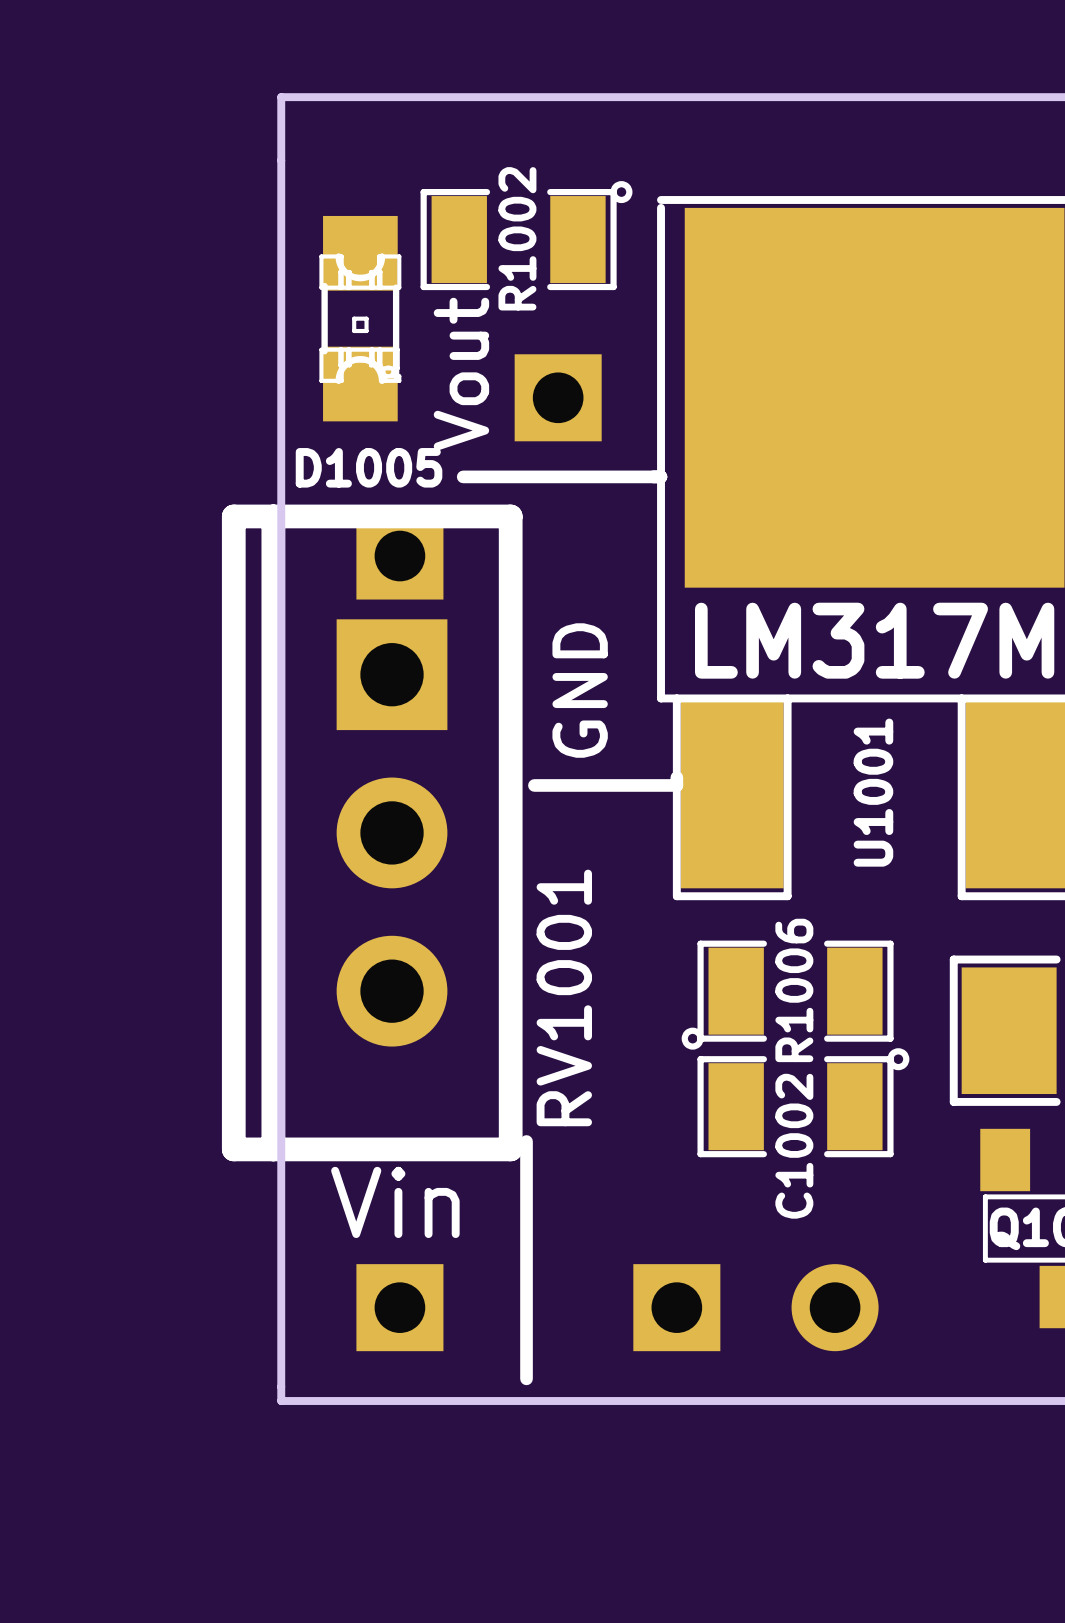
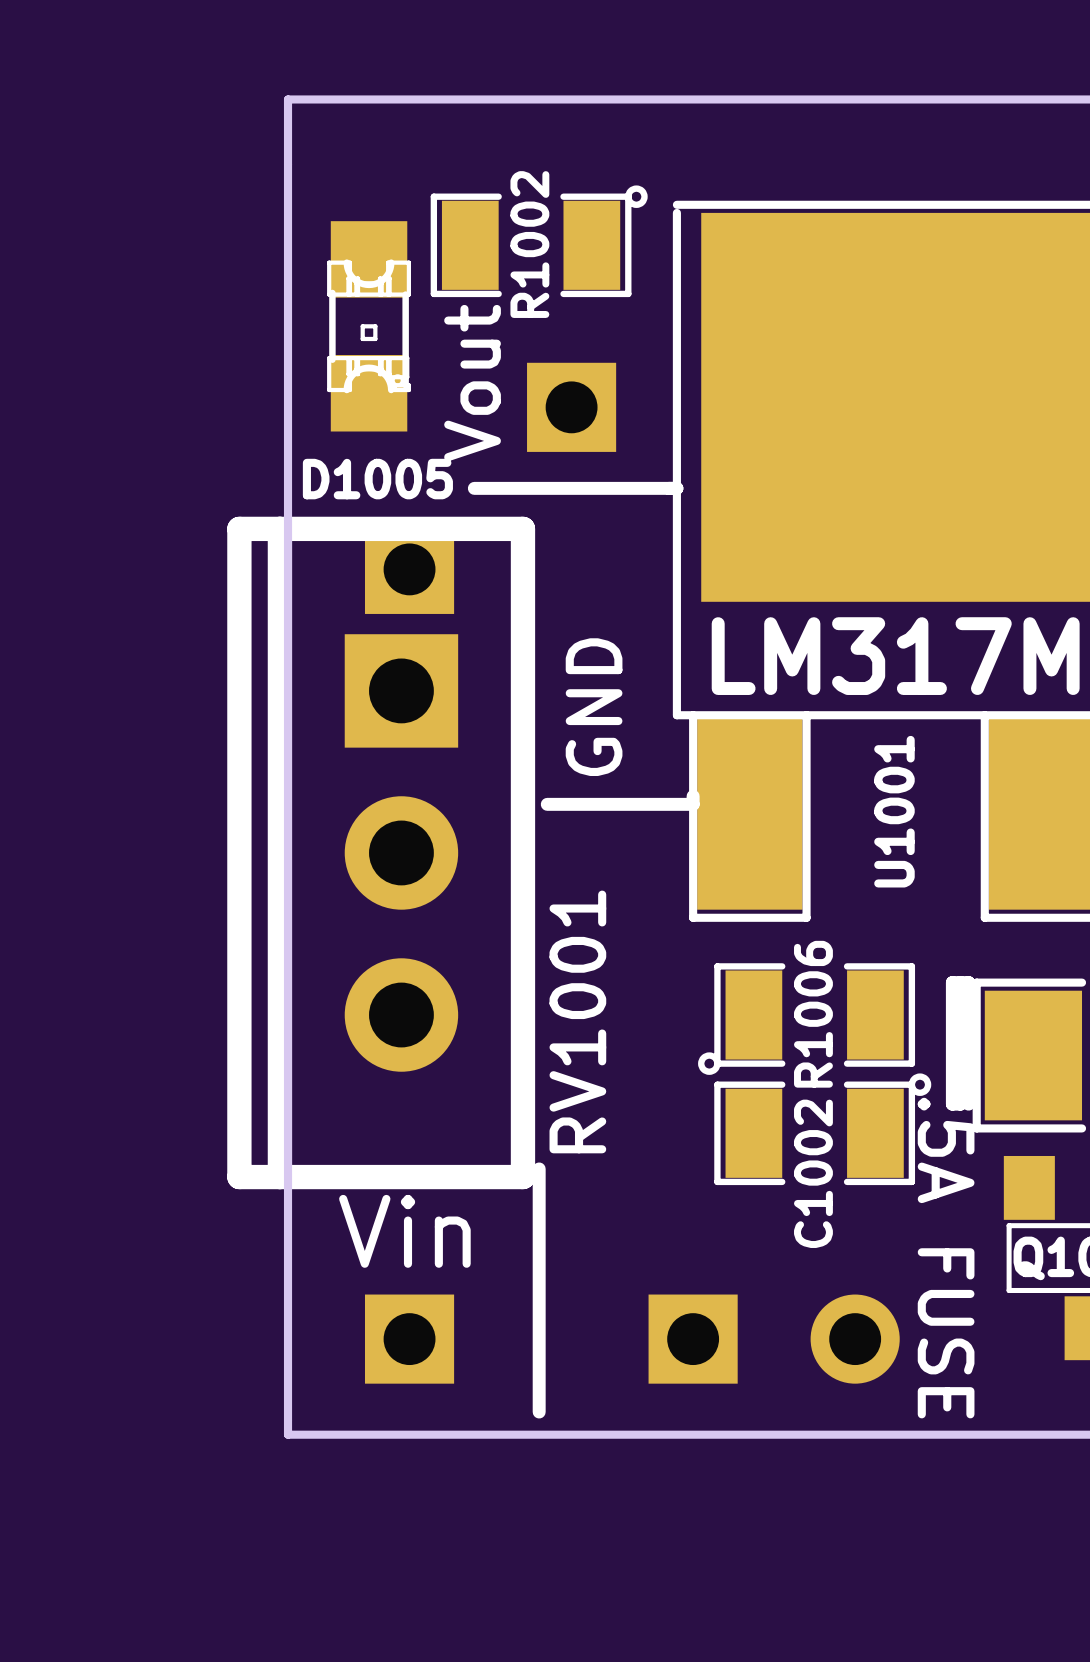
line: none -> (960, 982) (960, 1104) (952, 1104) (952, 982) (968, 982) (968, 1104)
text: none -> .5A FUSE (946, 1258)

